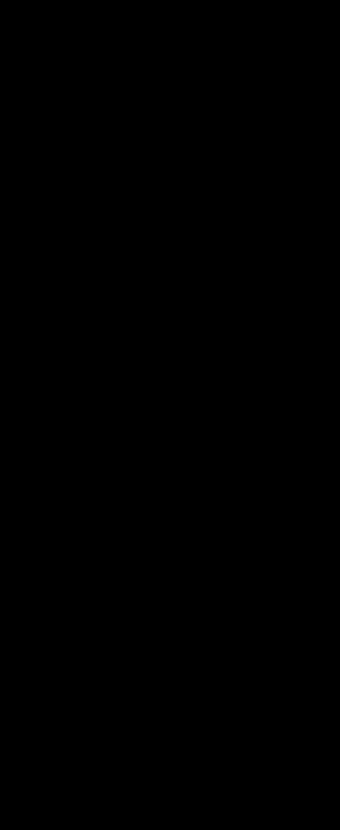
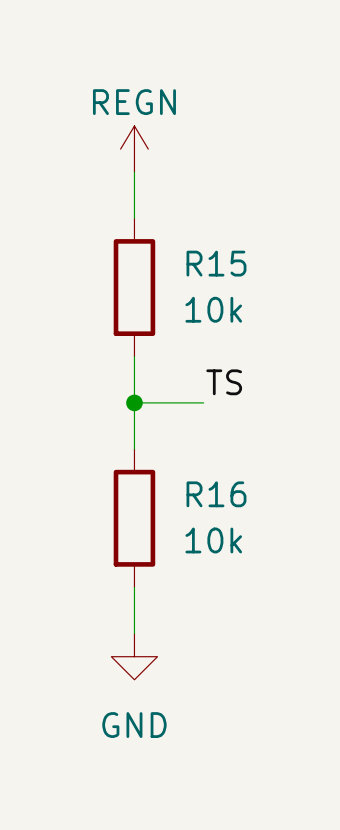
power symbol: none -> REGN (134, 149)
wire: none -> (134, 172) (134, 218)
R15: none -> 10k (134, 287)
wire: none -> (134, 356) (134, 449)
label: none -> TS (224, 382)
wire: none -> (134, 402) (203, 402)
junction: none -> (134, 402)
R16: none -> 10k (134, 518)
wire: none -> (134, 587) (134, 633)
power symbol: none -> GND (134, 656)

